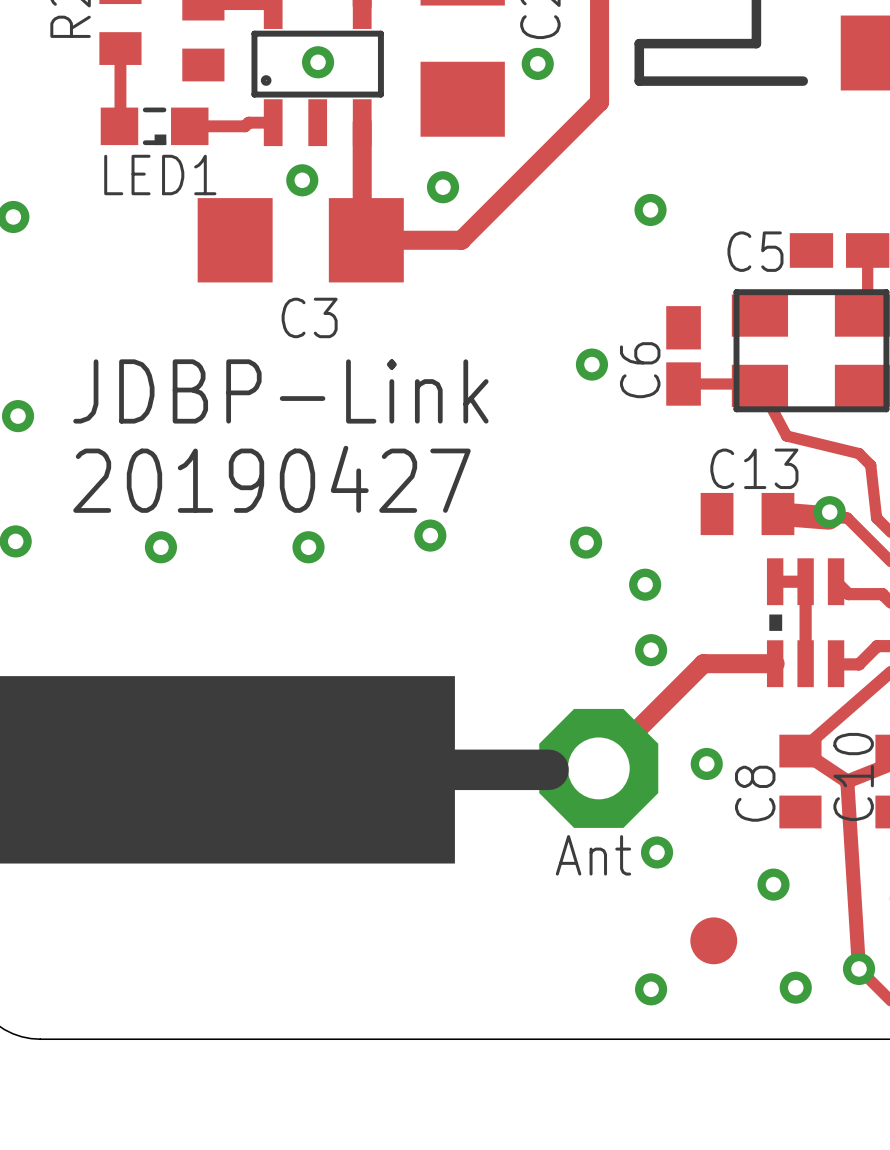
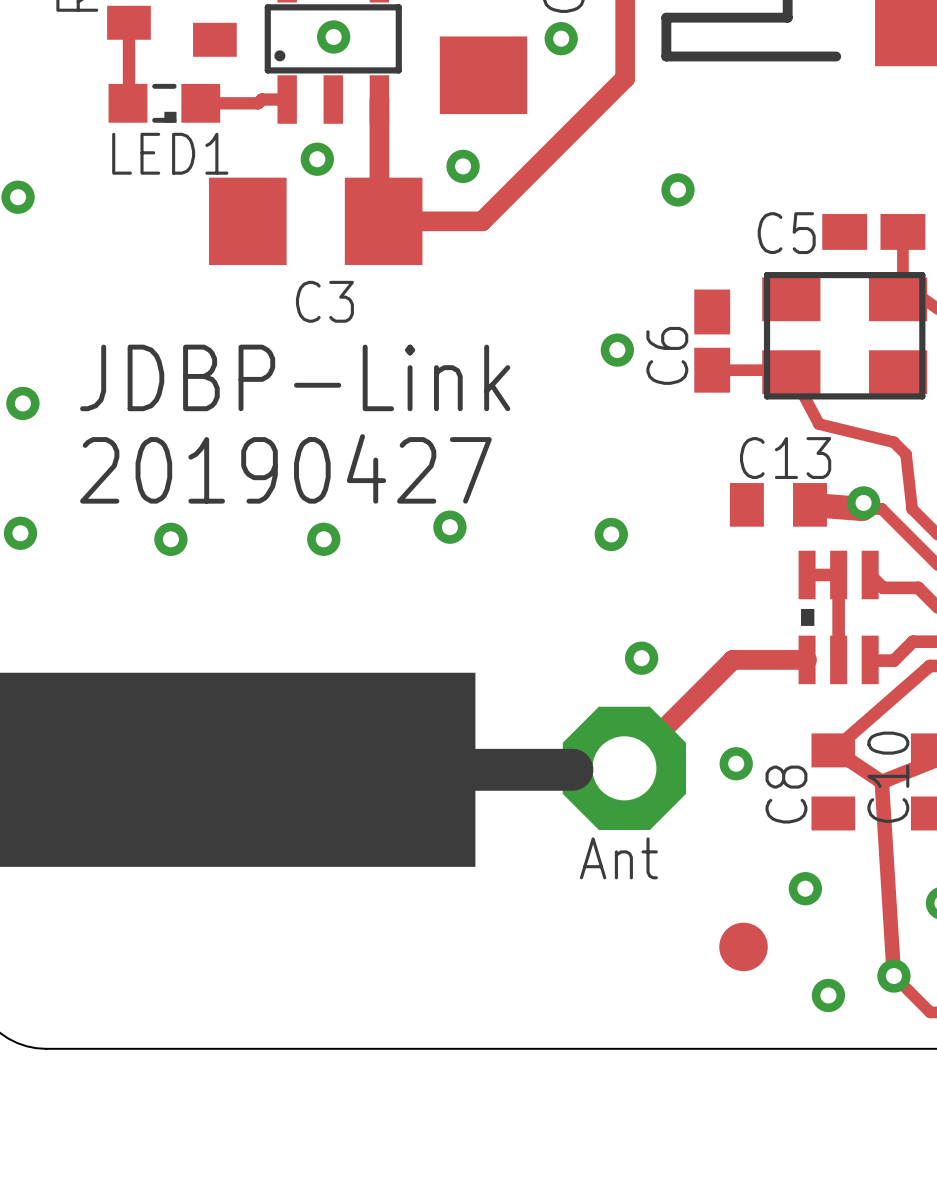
via: (645, 584) -> none
via position: (651, 650) -> (641, 658)
via: (657, 852) -> none
via: (651, 989) -> none

